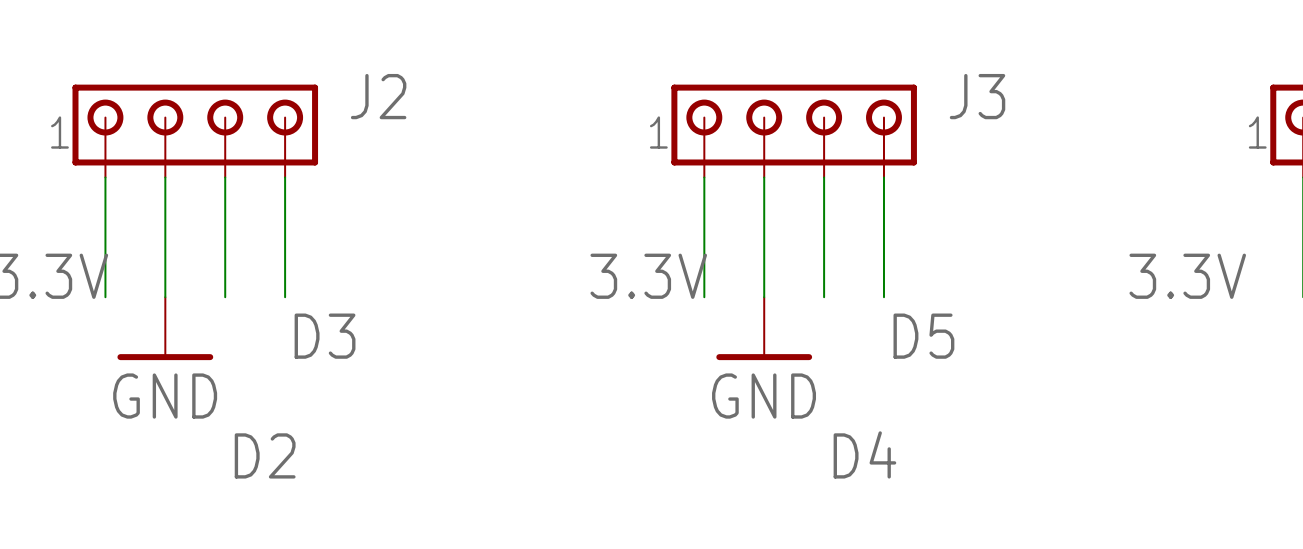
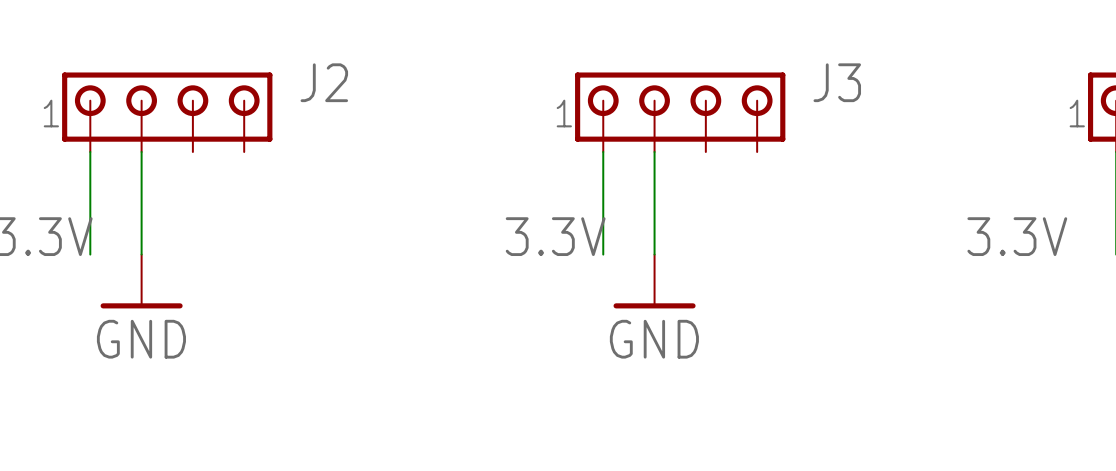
wire: (225, 177) (225, 297) -> none
wire: (285, 177) (285, 297) -> none
wire: (824, 177) (824, 297) -> none
wire: (883, 177) (883, 297) -> none
label: D3 (325, 336) -> none
label: D5 (923, 336) -> none
label: D4 (864, 454) -> none
label: D2 (265, 455) -> none

